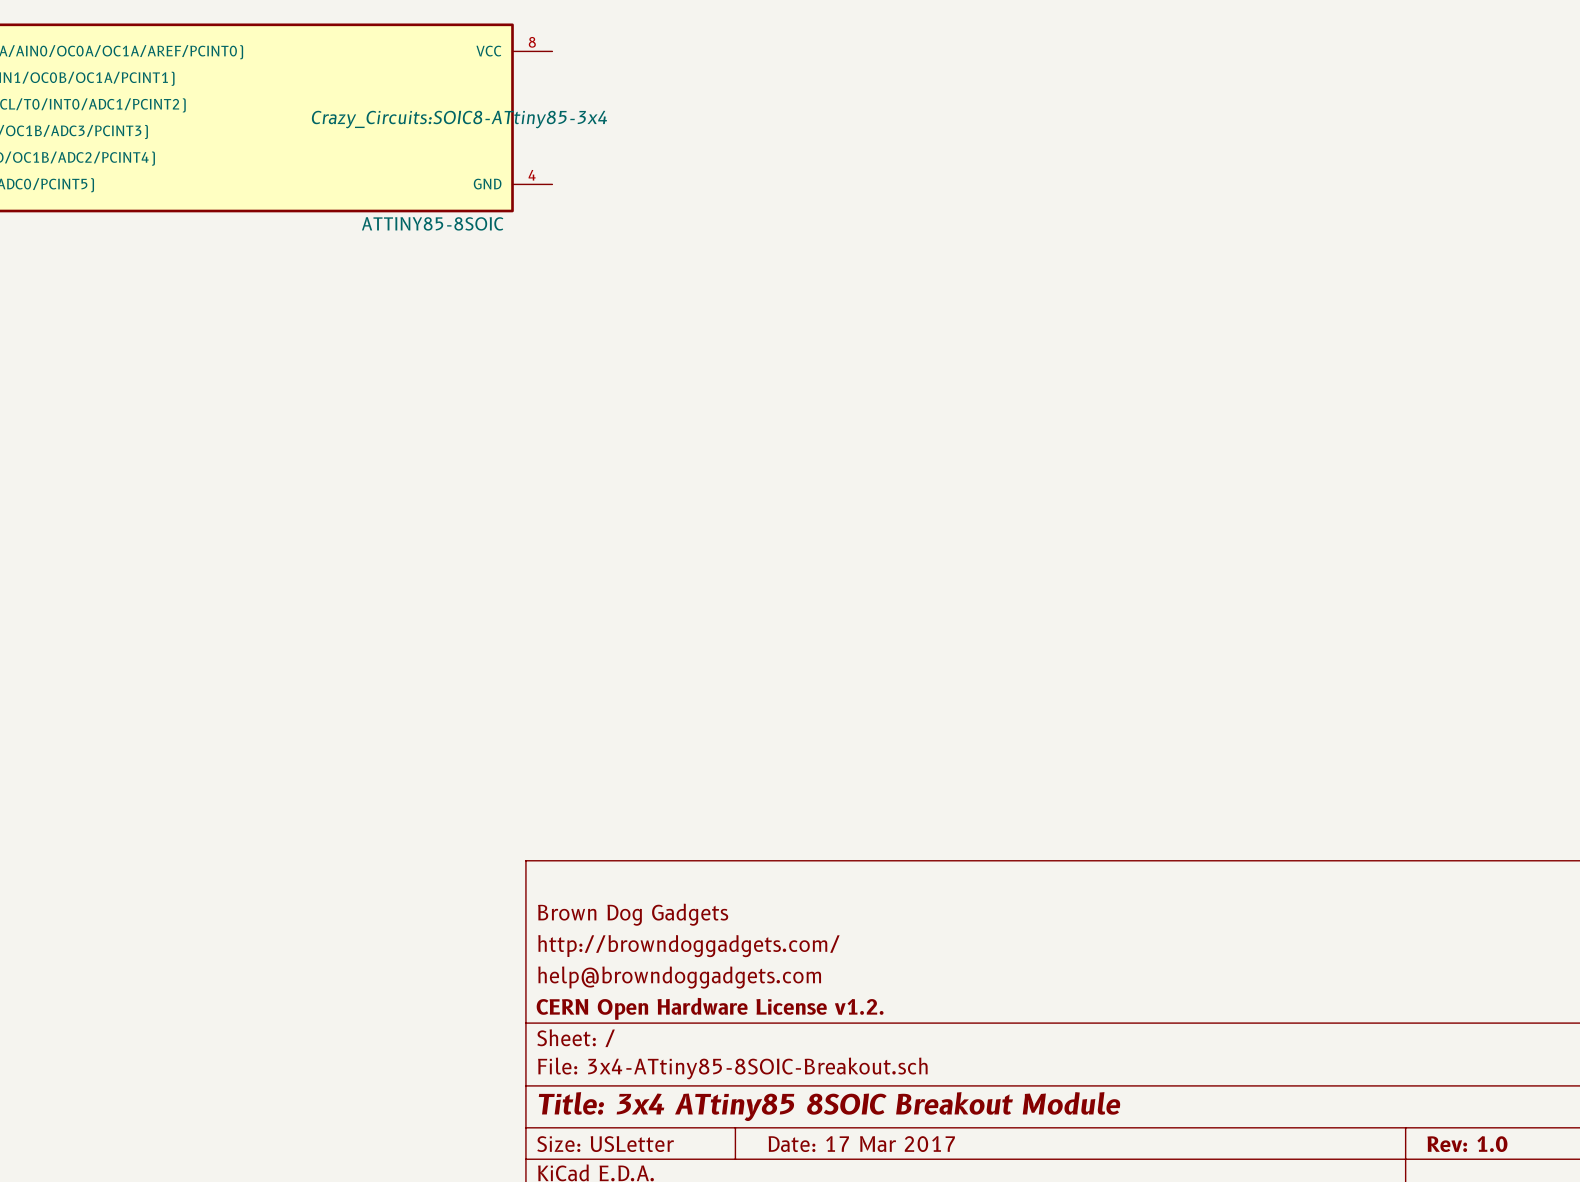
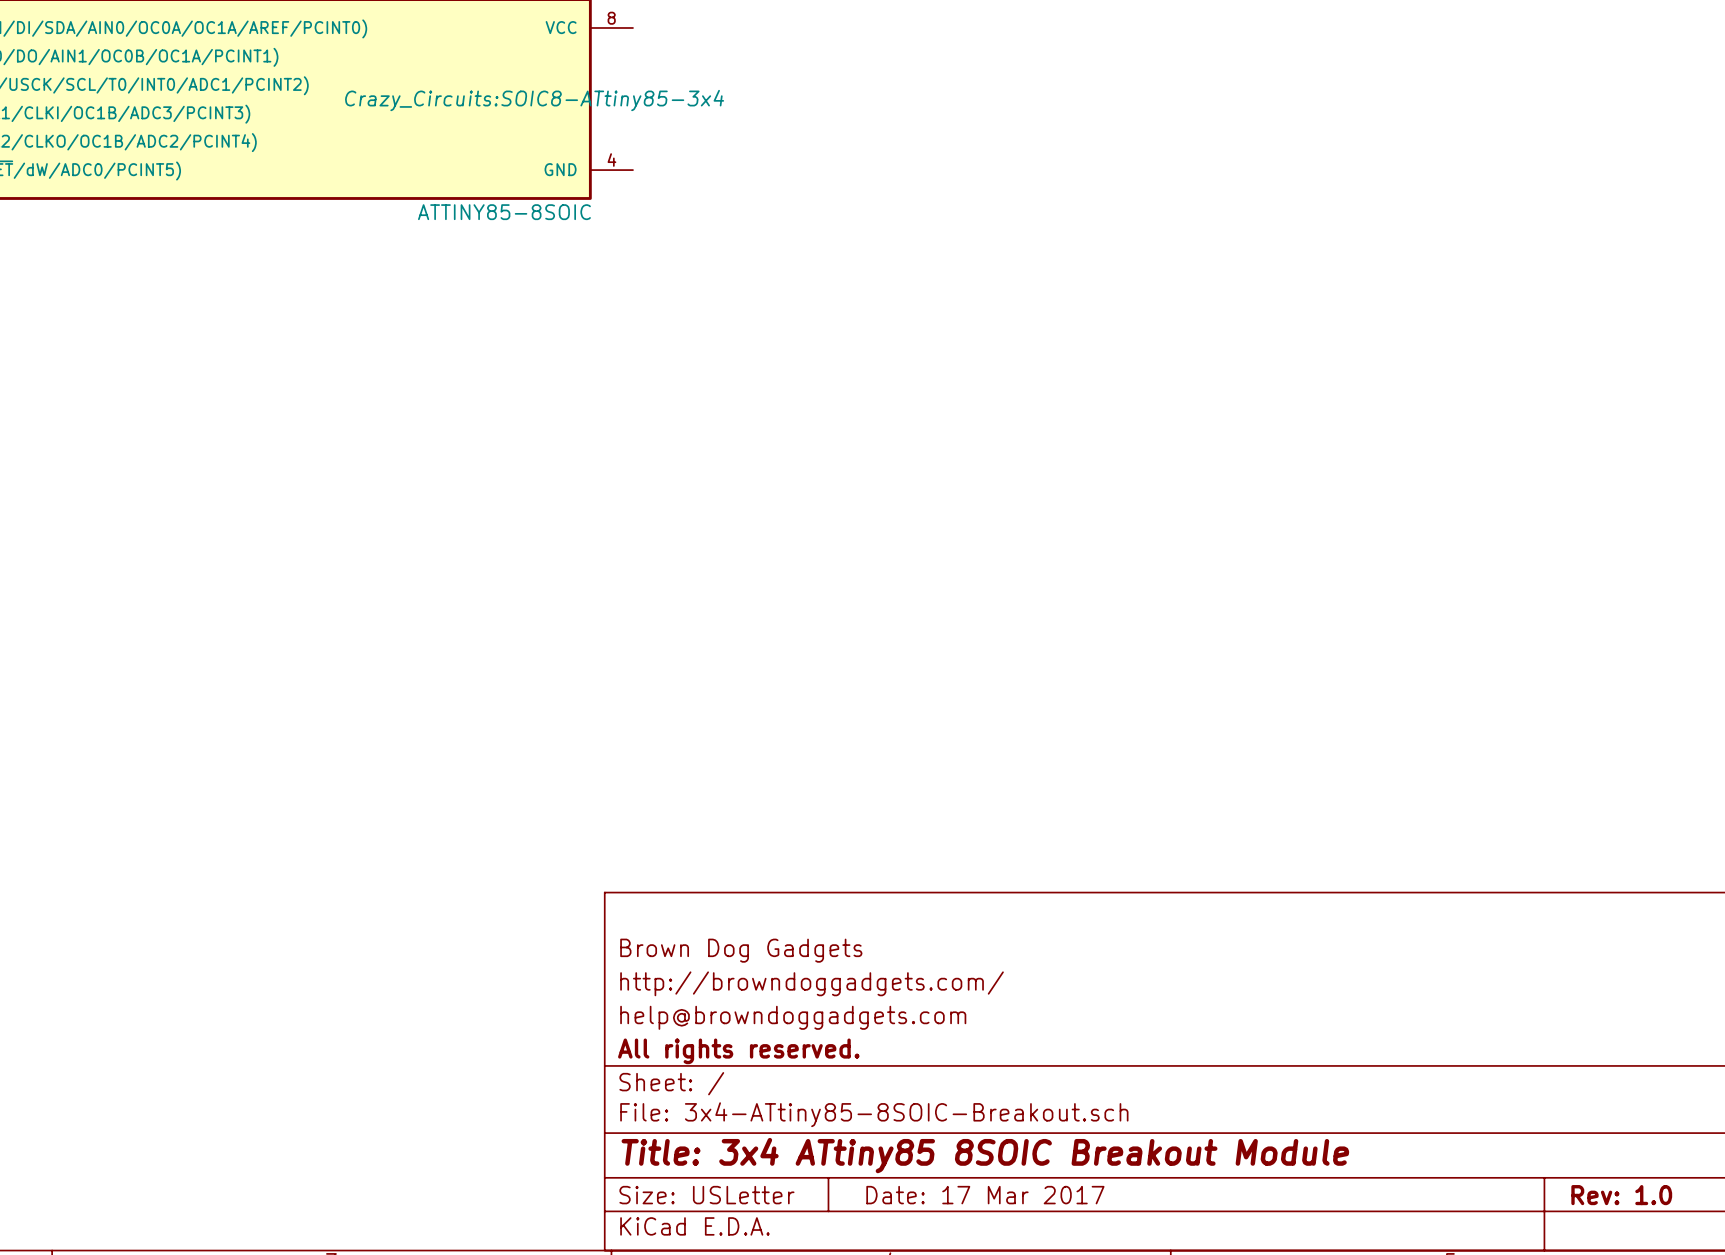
title block: CERN Open Hardware License v1.2. (710, 1008) -> All rights reserved. (738, 1051)

